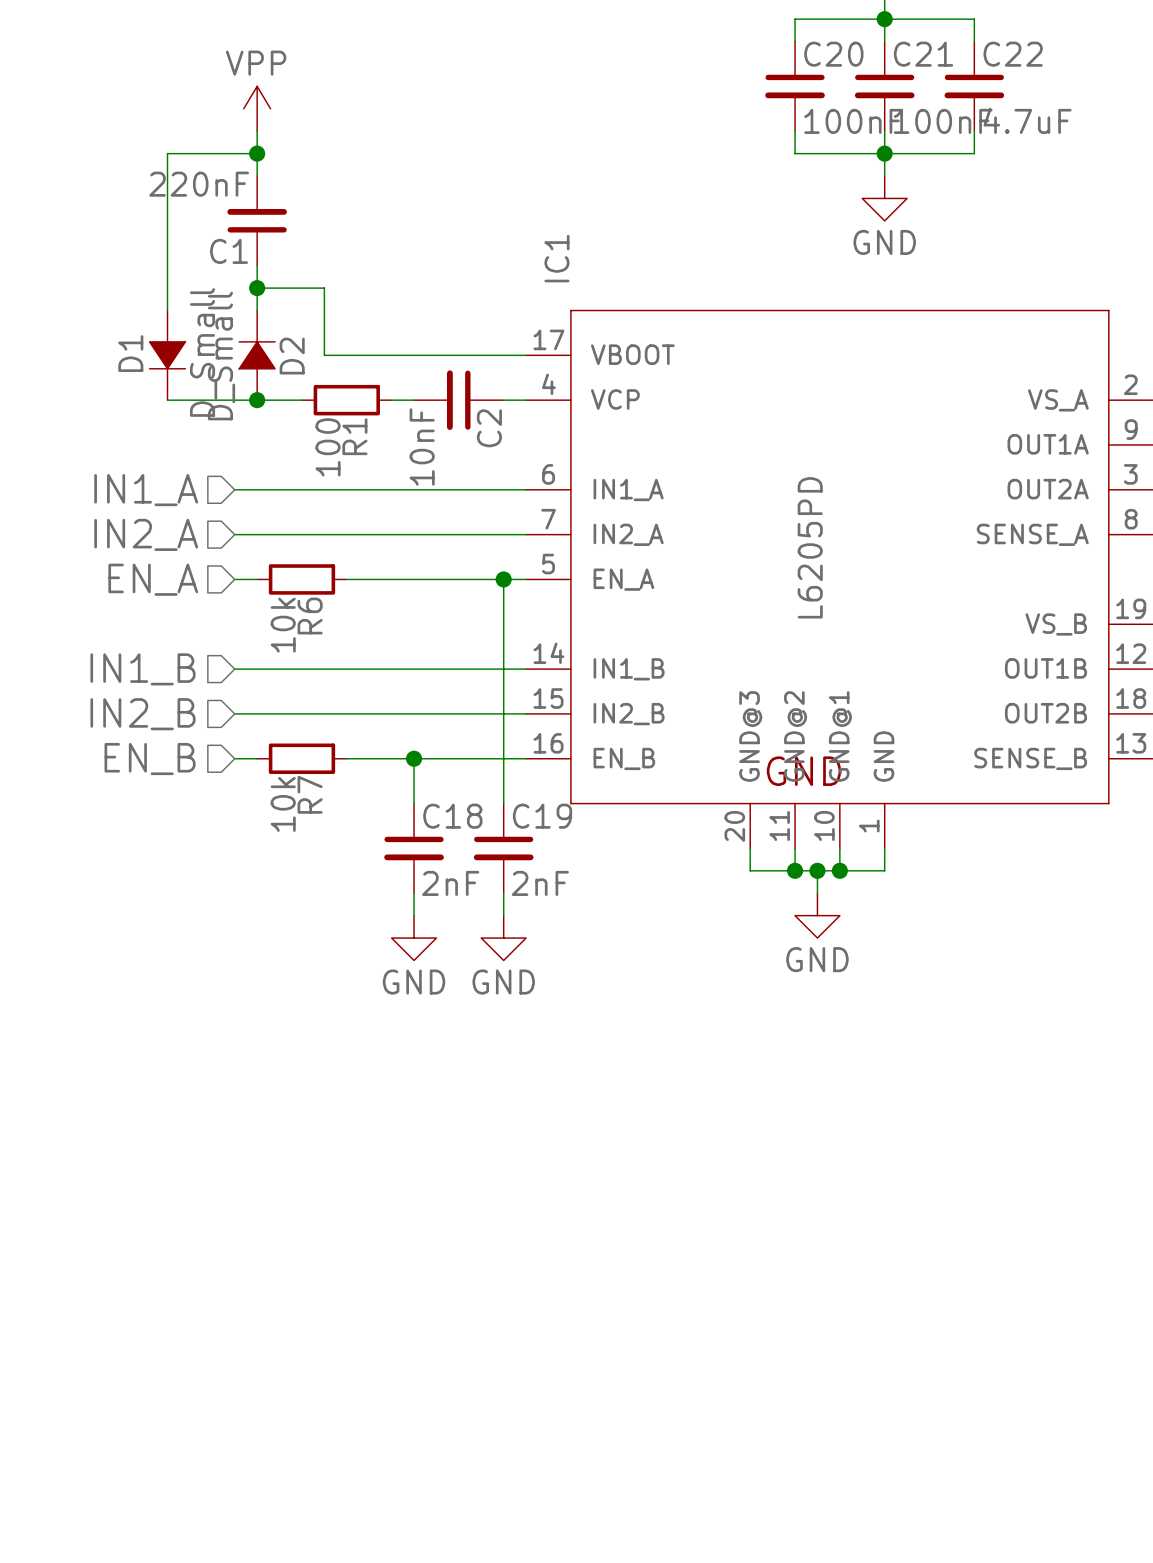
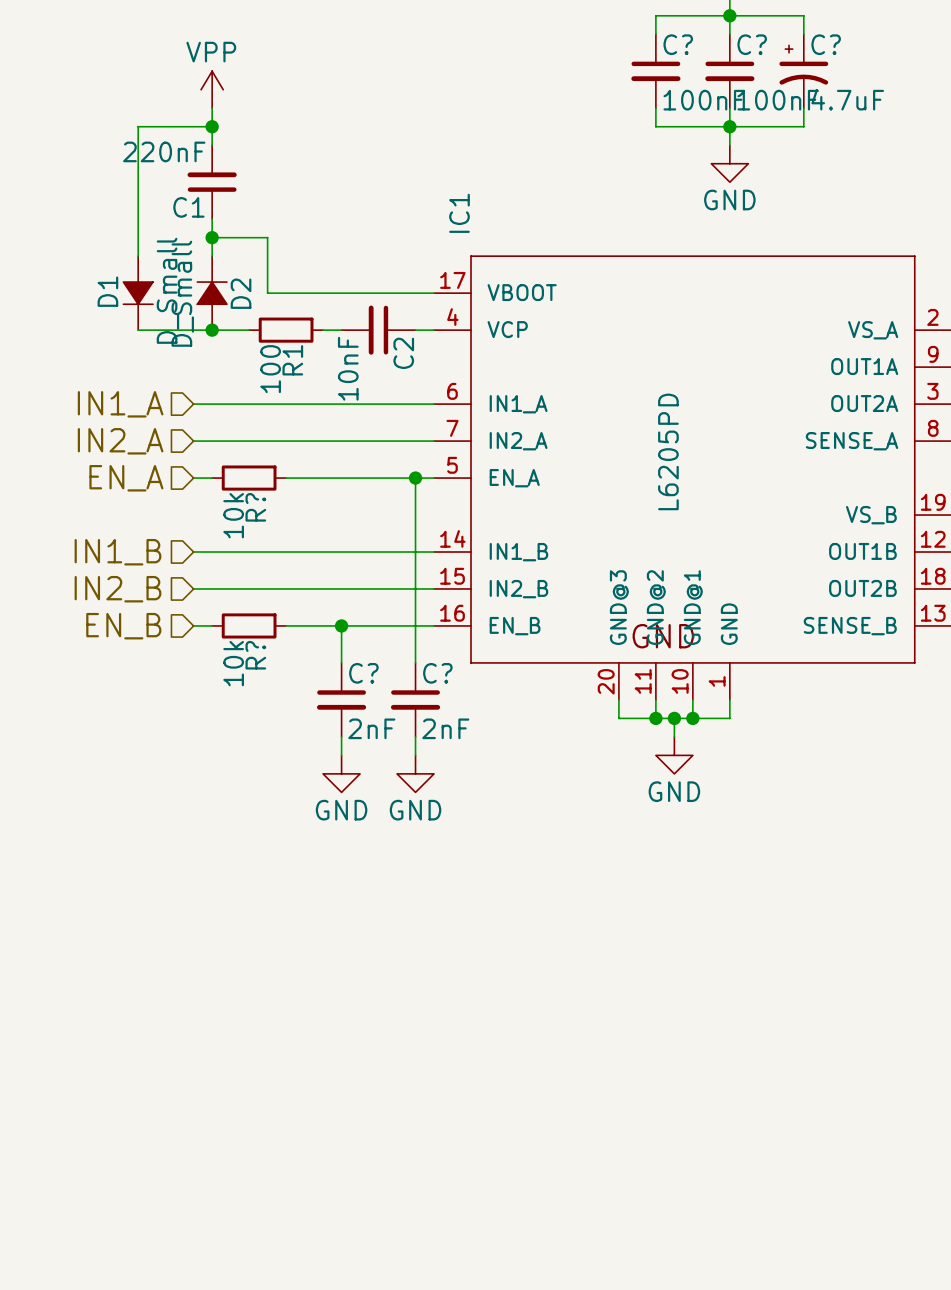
C20 name: C20 (833, 54) -> C? (678, 44)
C21 name: C21 (923, 54) -> C? (752, 44)
C22: 4.7uF (974, 86) -> none
C?: none -> 4.7uF (803, 71)
R6 name: R6 (310, 616) -> R? (255, 507)
R7 name: R7 (310, 794) -> R? (255, 655)
C18 name: C18 (452, 816) -> C? (363, 673)
C19 name: C19 (542, 816) -> C? (437, 673)

